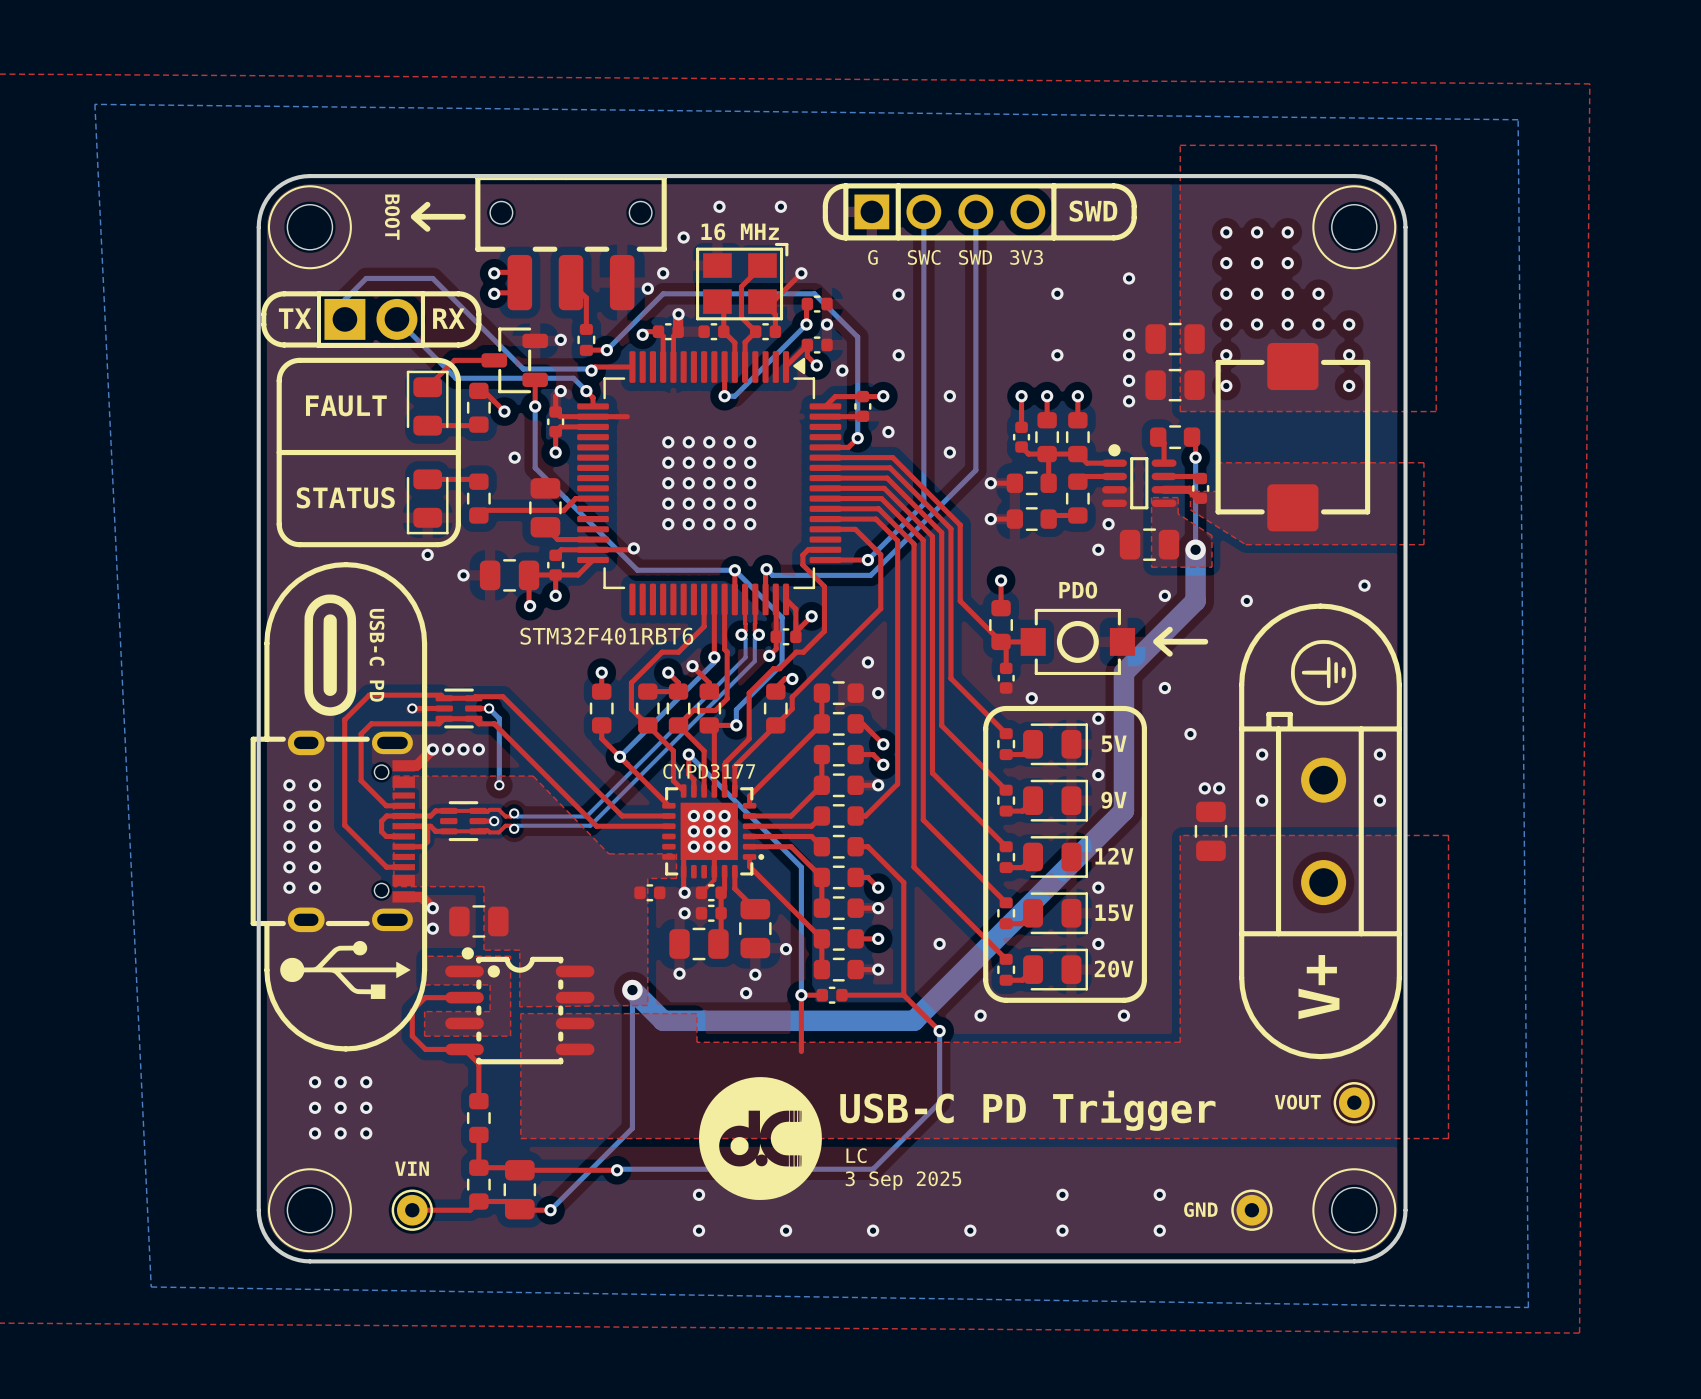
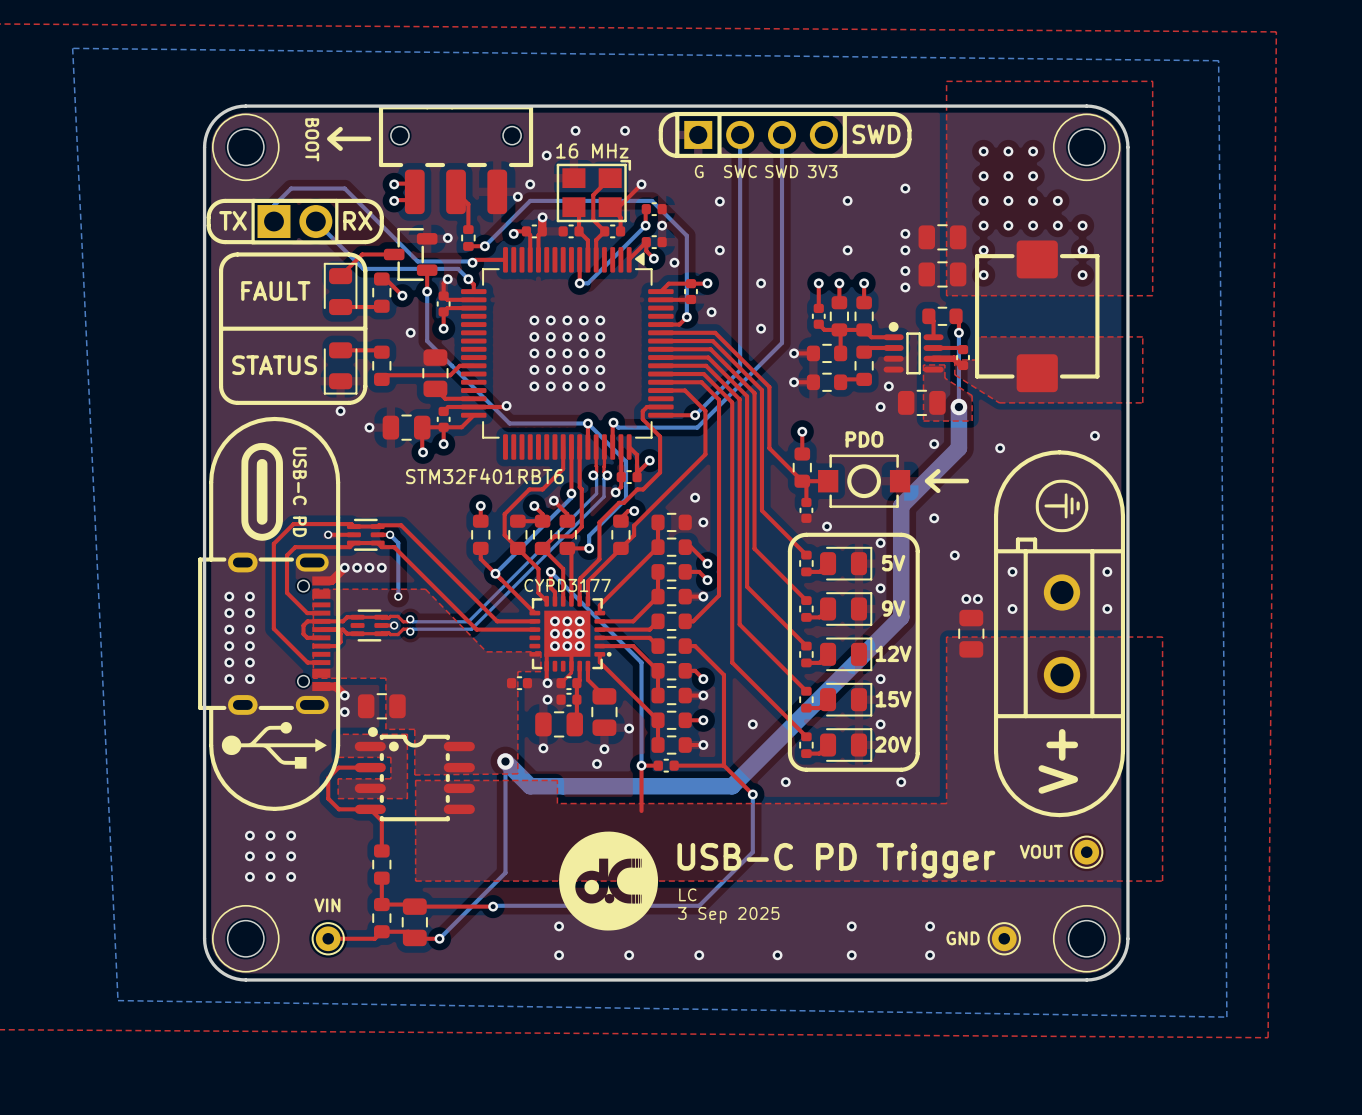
top track: (593, 416) (627, 416) -> none

